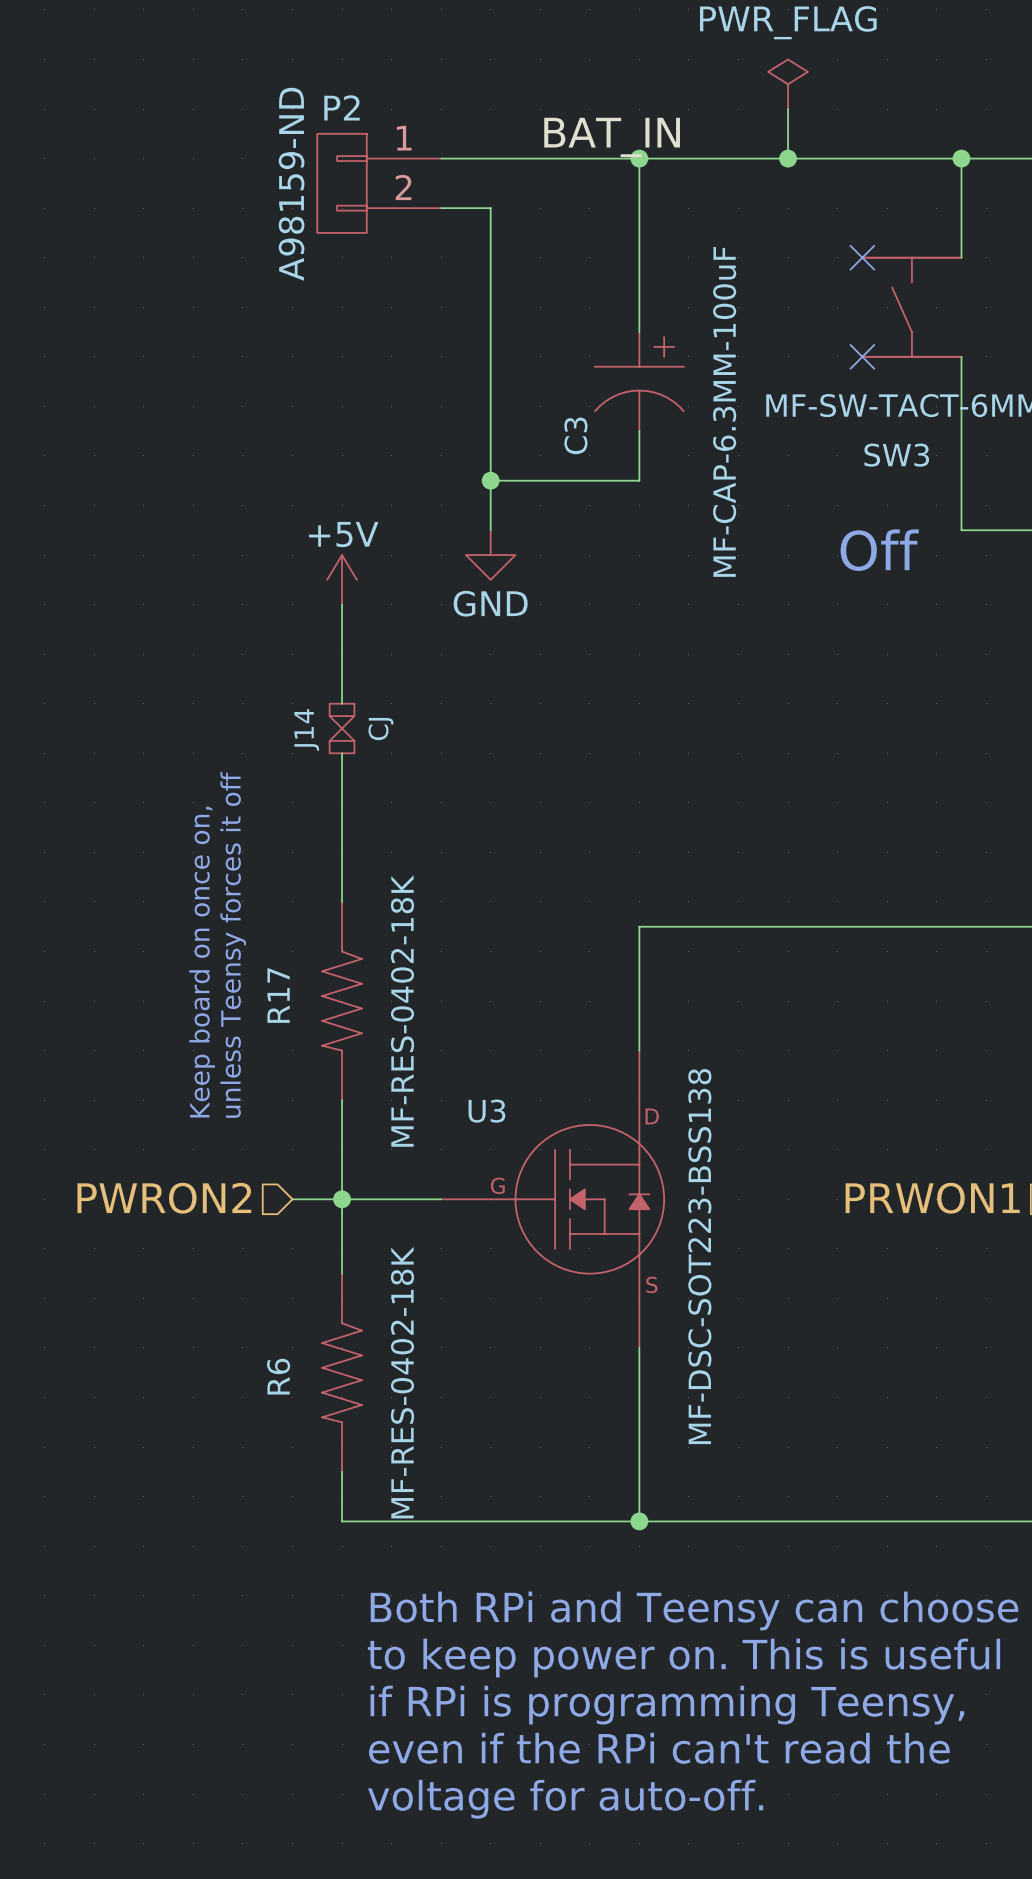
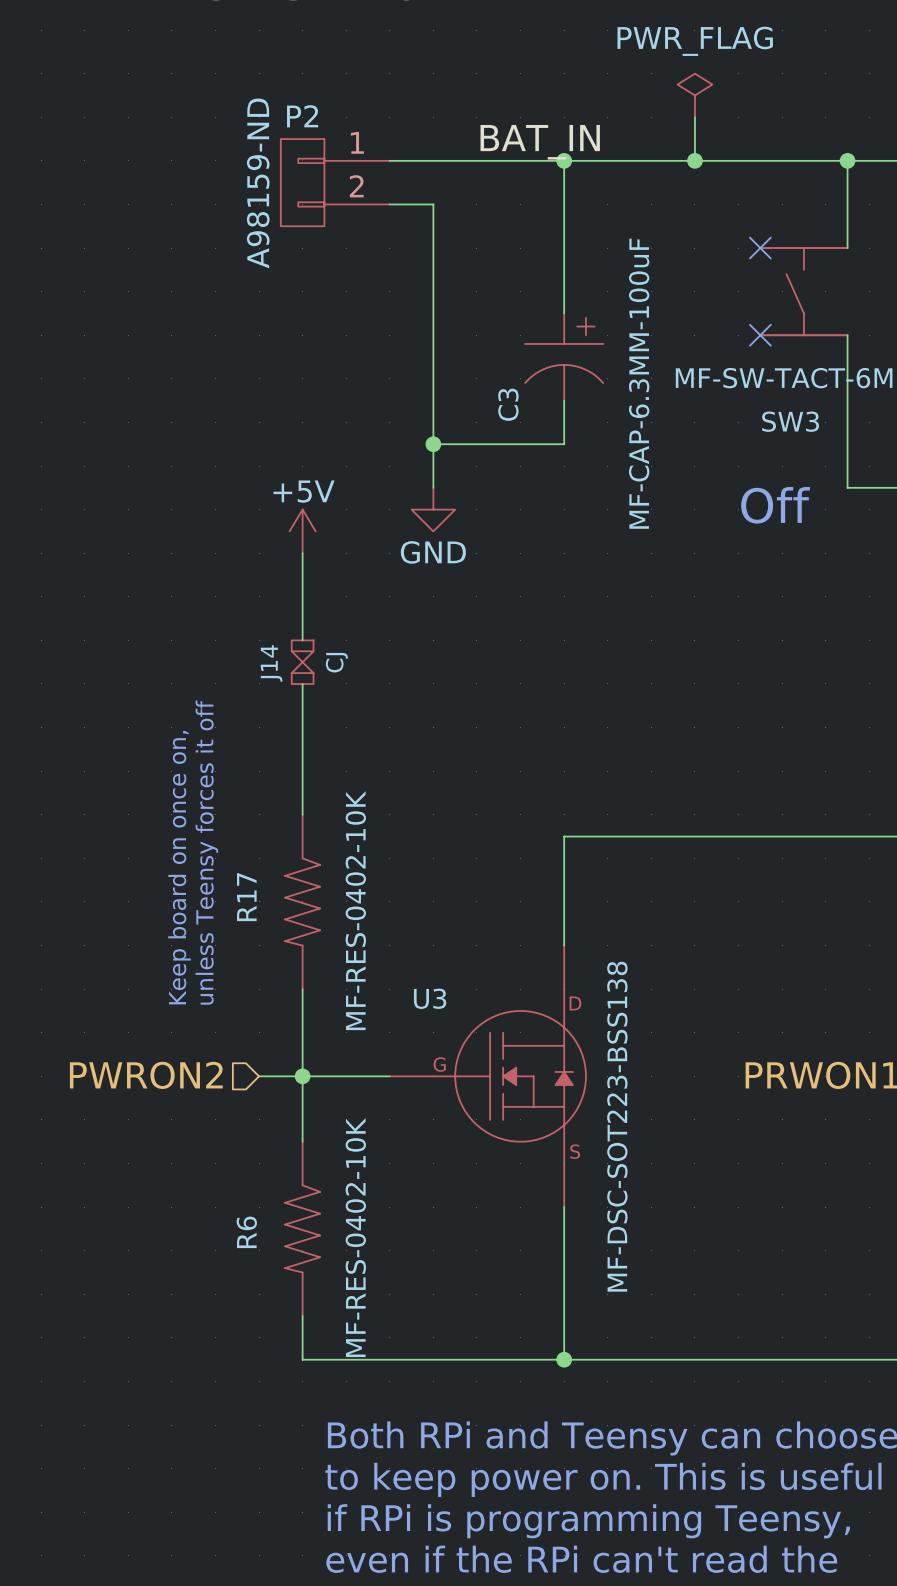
R17 value: MF-RES-0402-18K (402, 1010) -> MF-RES-0402-10K (355, 910)
R6 value: MF-RES-0402-18K (402, 1382) -> MF-RES-0402-10K (355, 1237)

